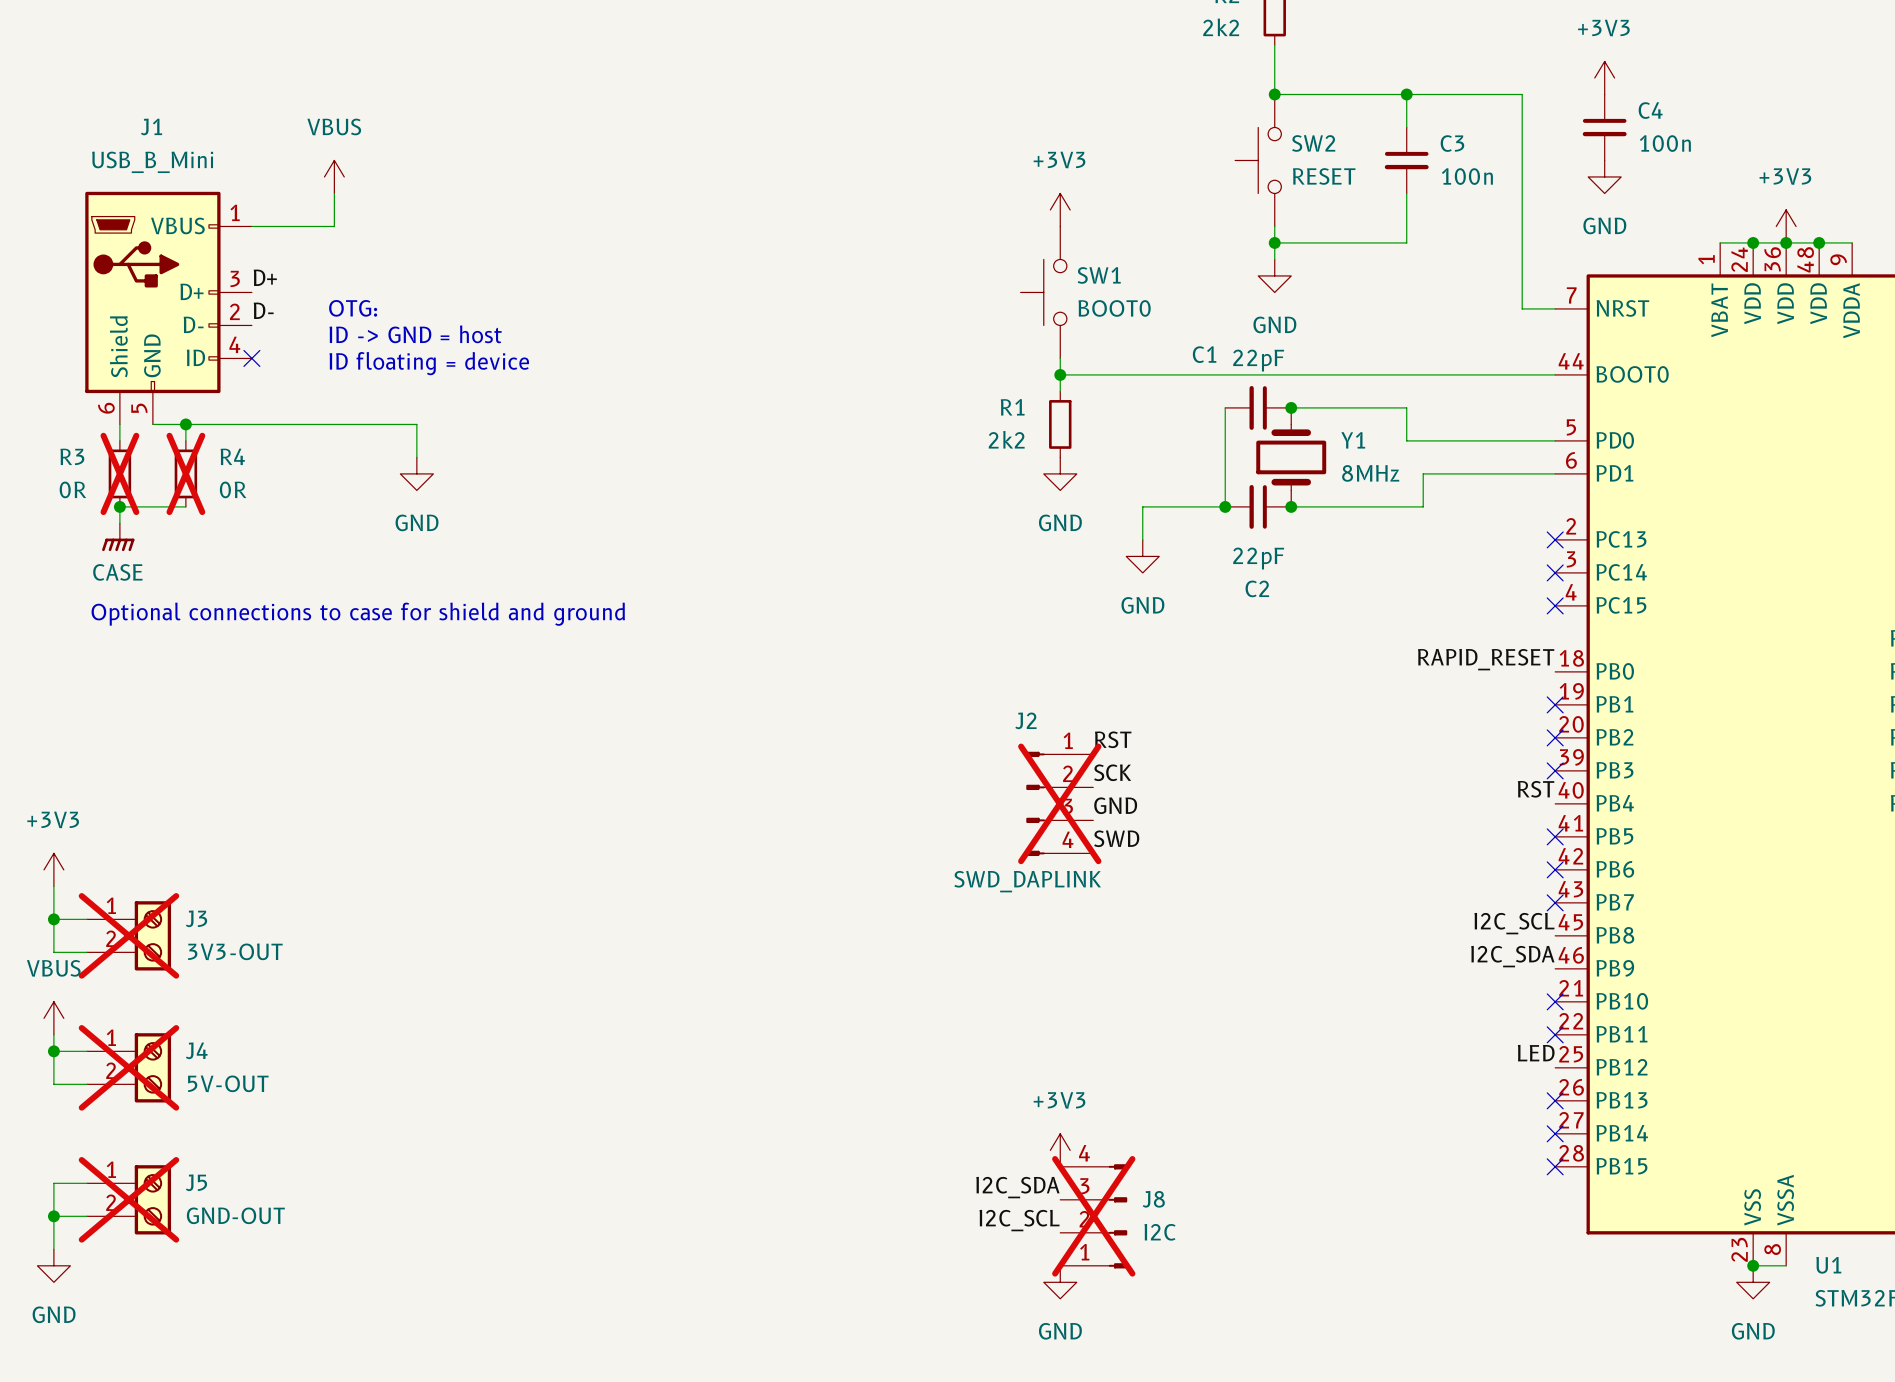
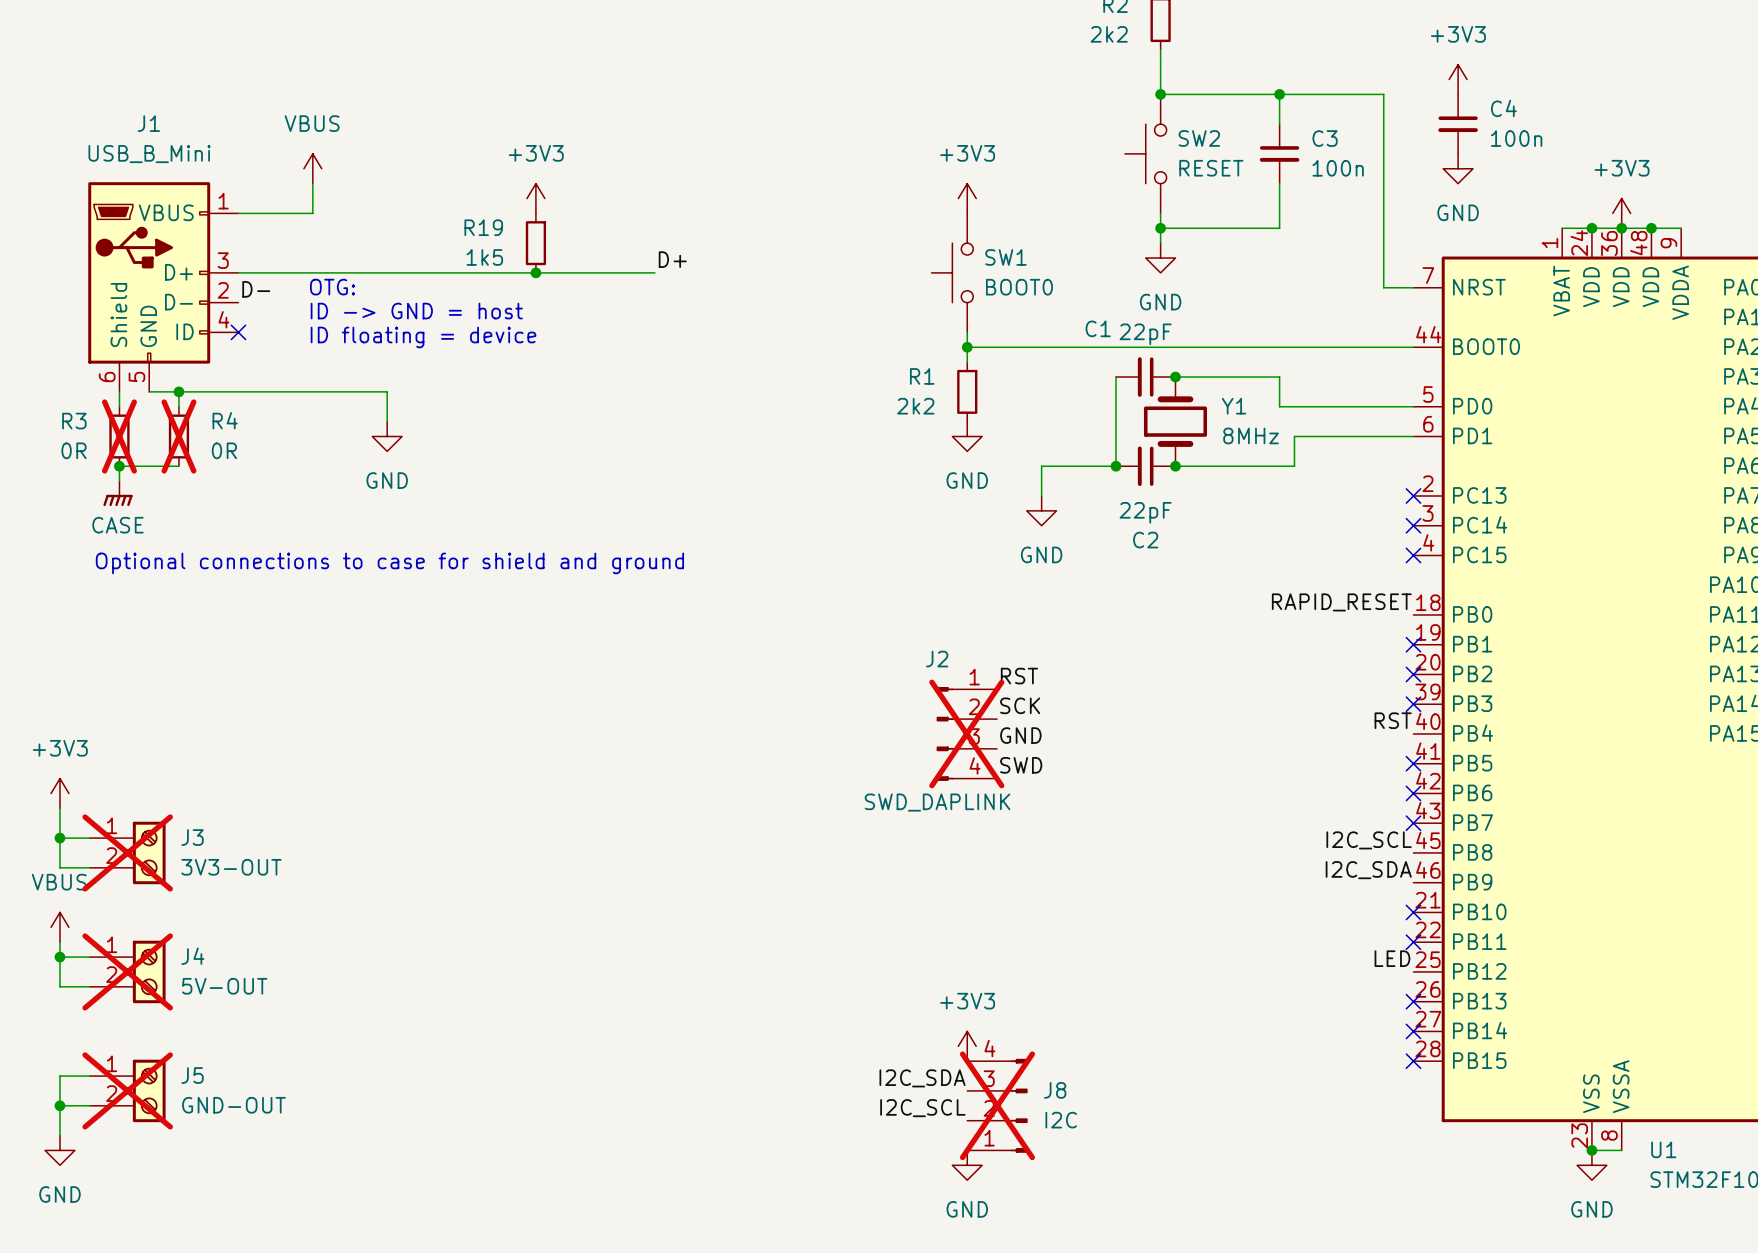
power symbol: none -> +3V3 (535, 198)
R19: none -> 1k5 (535, 243)
label: D+ (265, 277) -> none
label: none -> D+ (672, 259)
wire: none -> (238, 272) (654, 272)
junction: none -> (535, 272)

